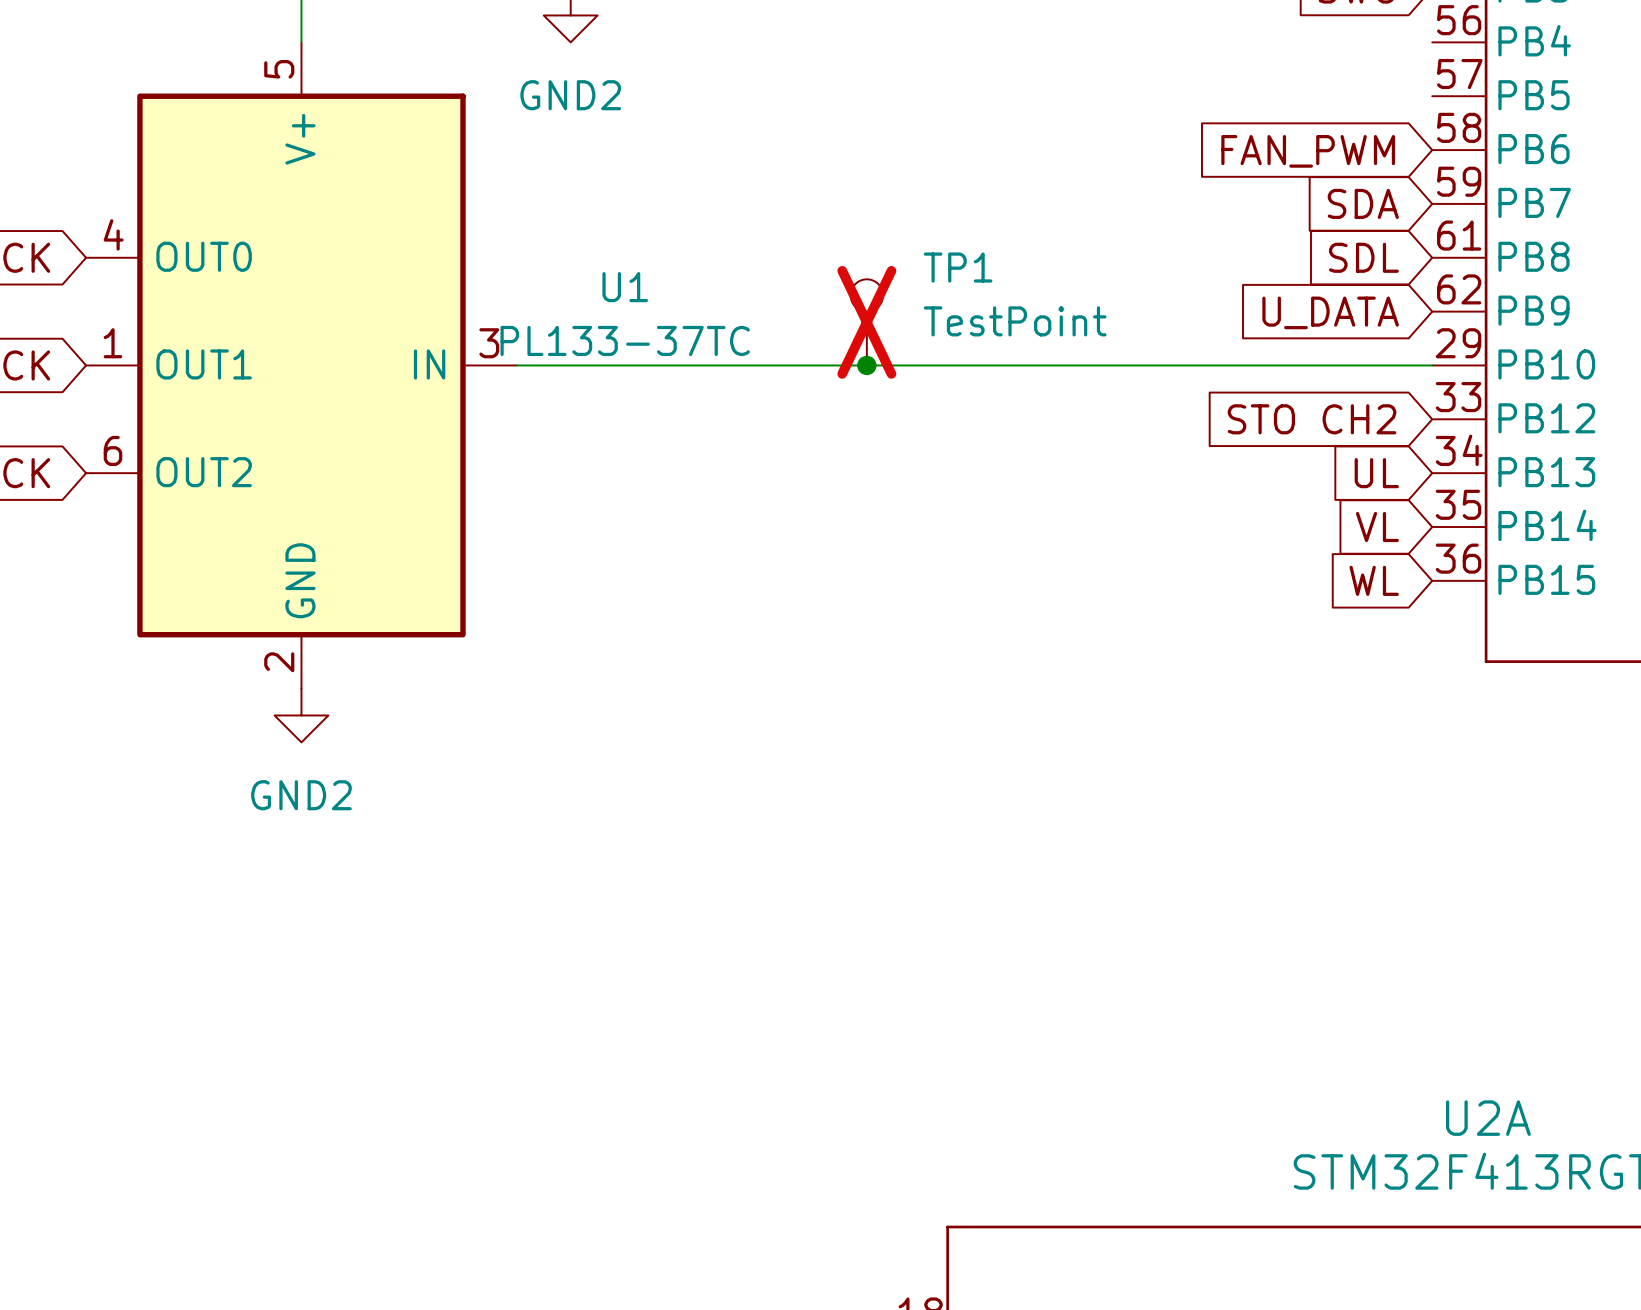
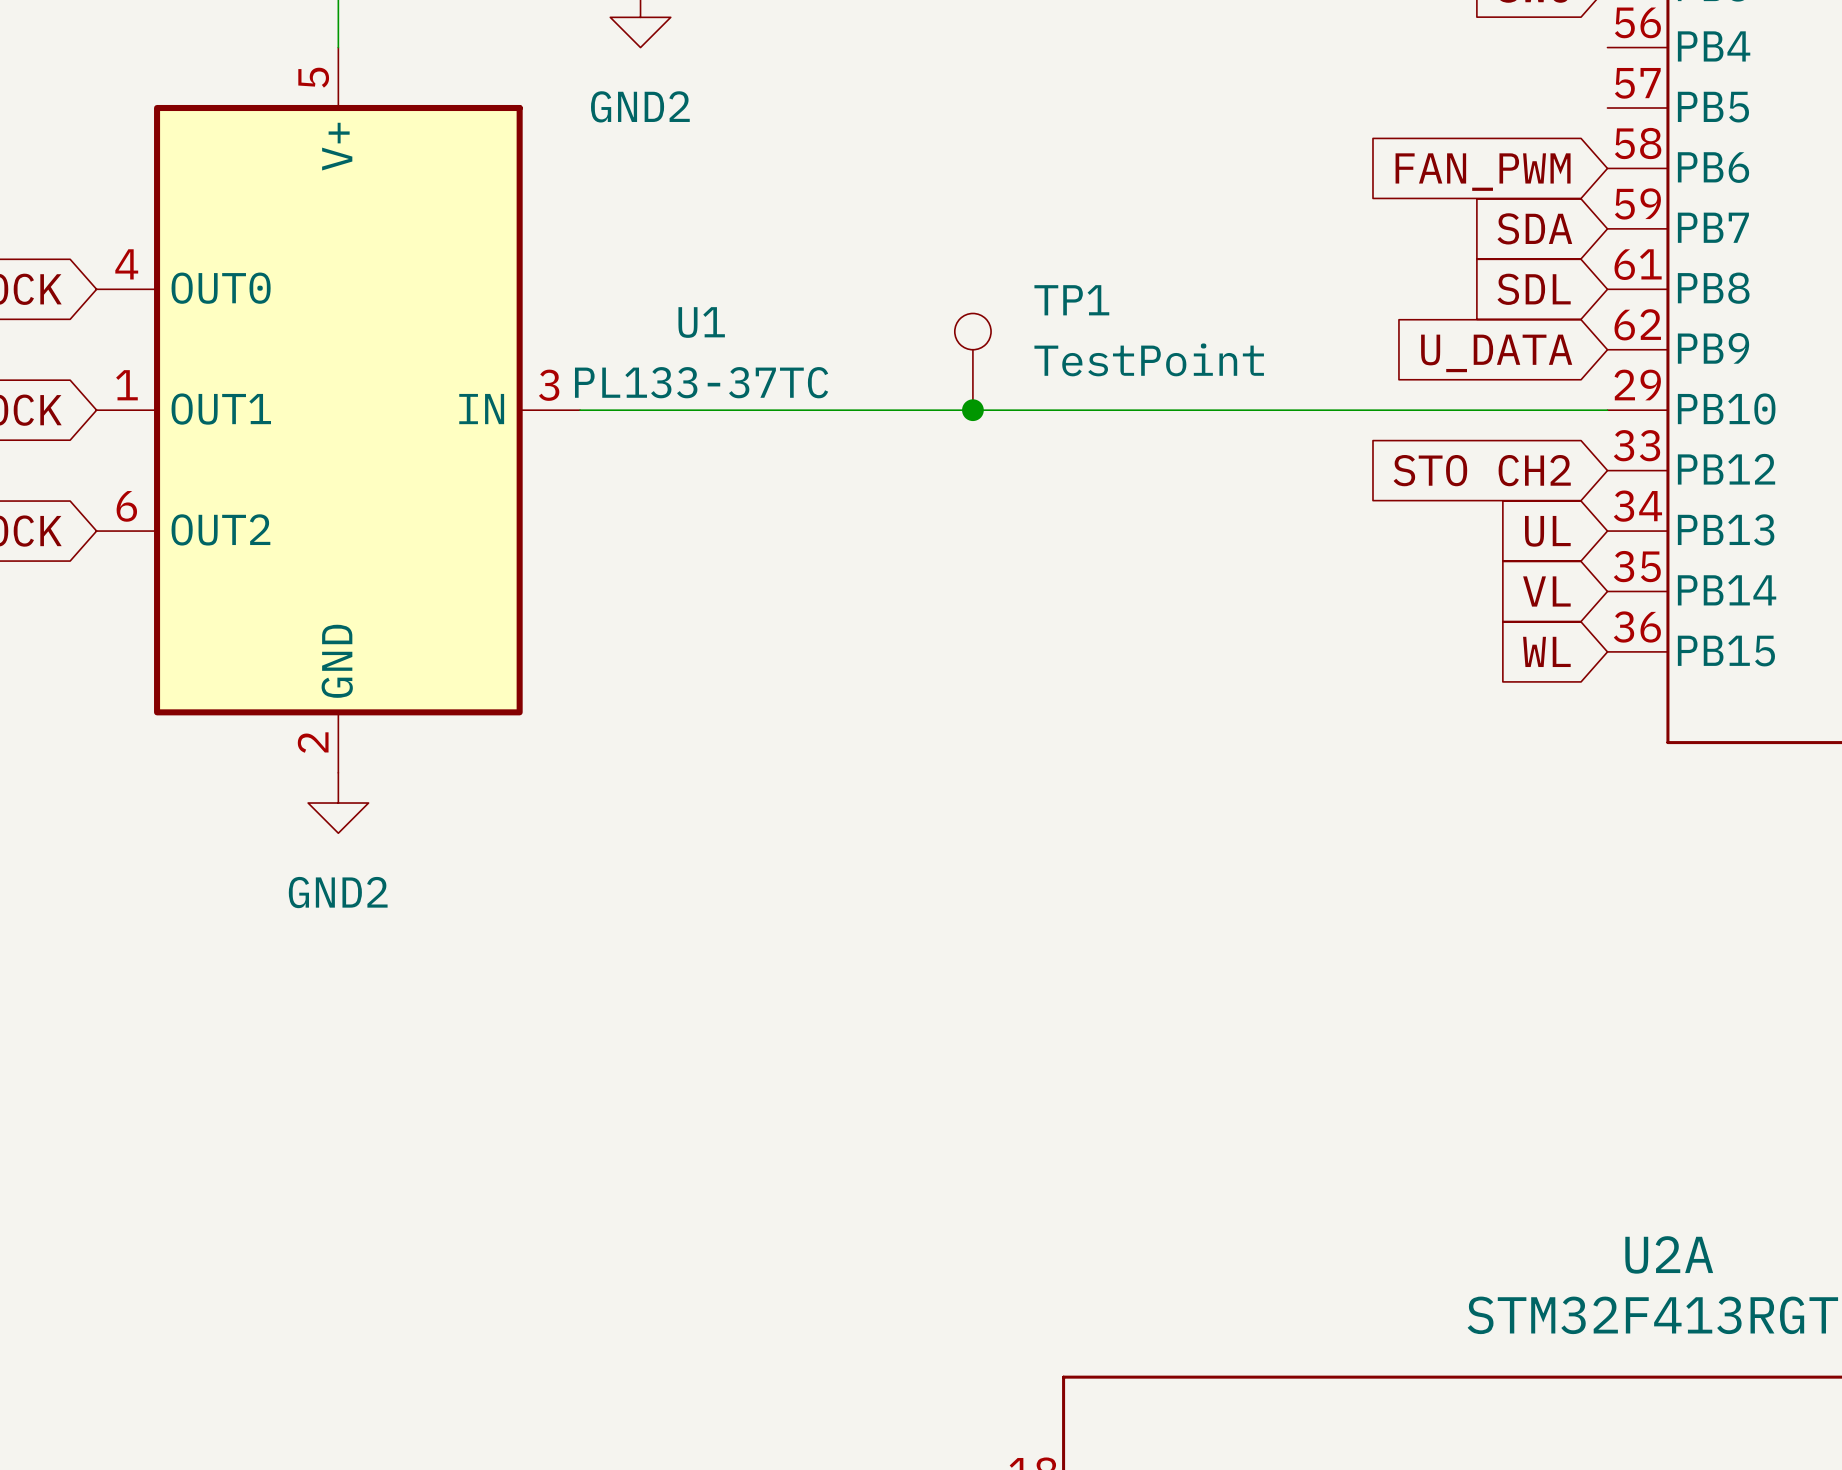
TP1 do-not-place cross: (866, 322) -> none

